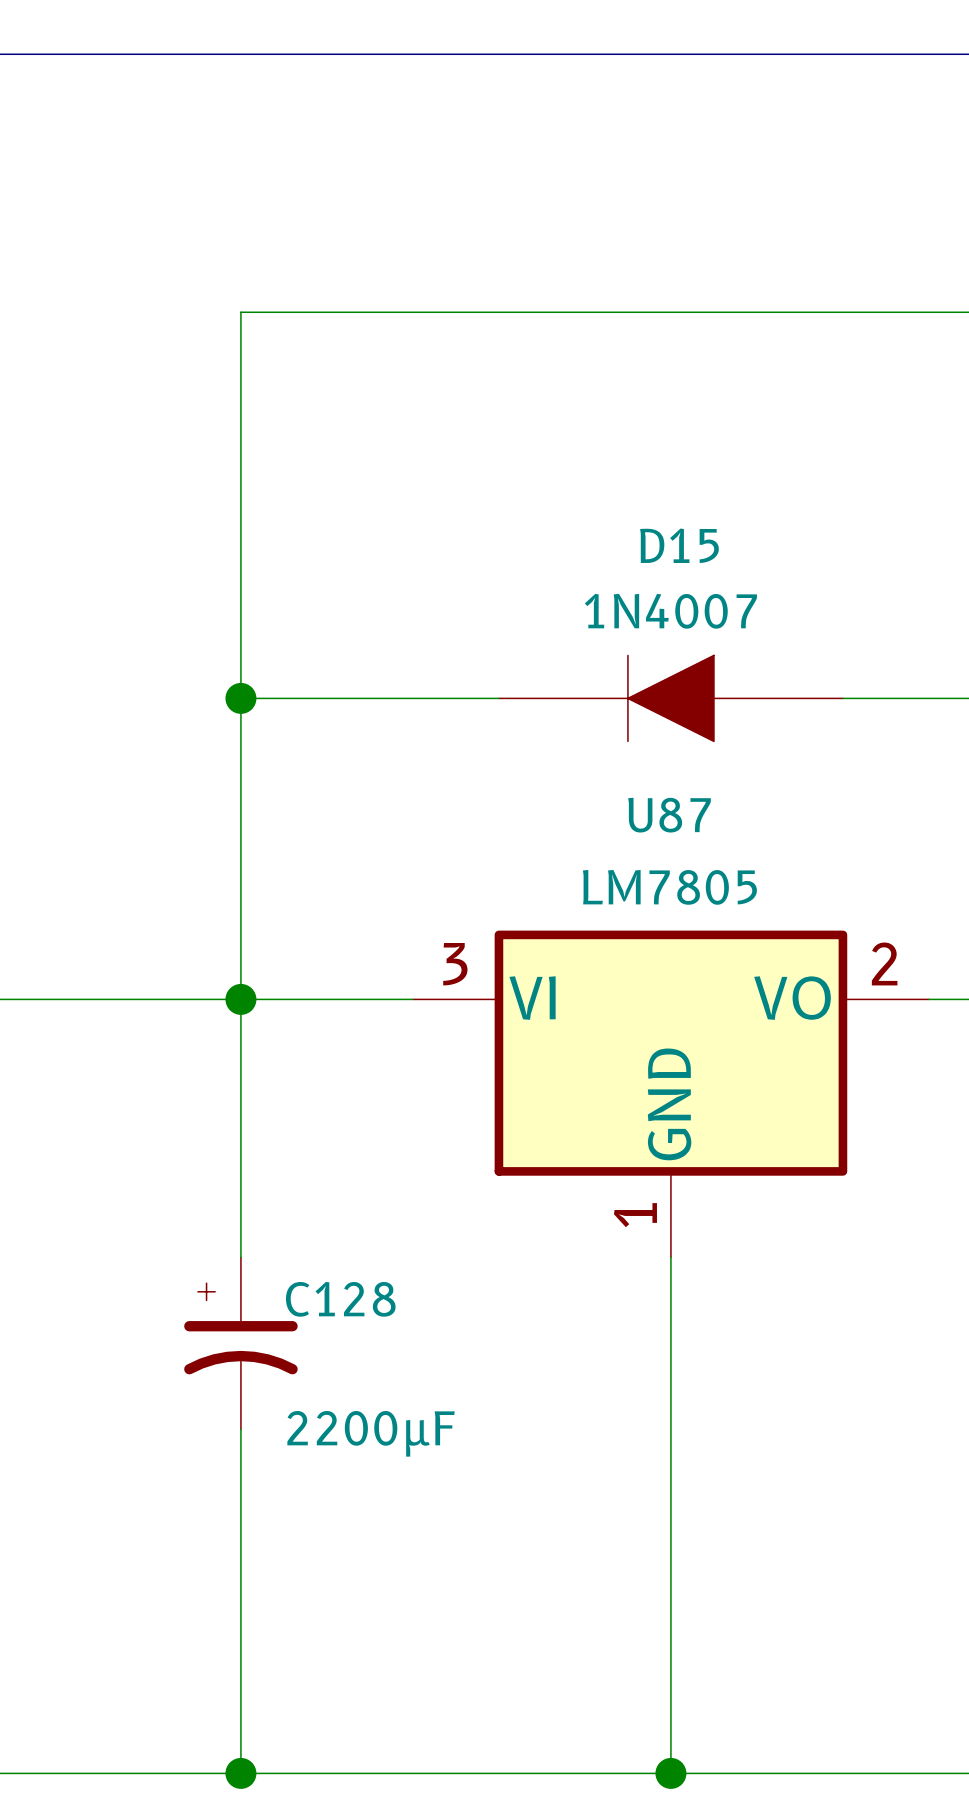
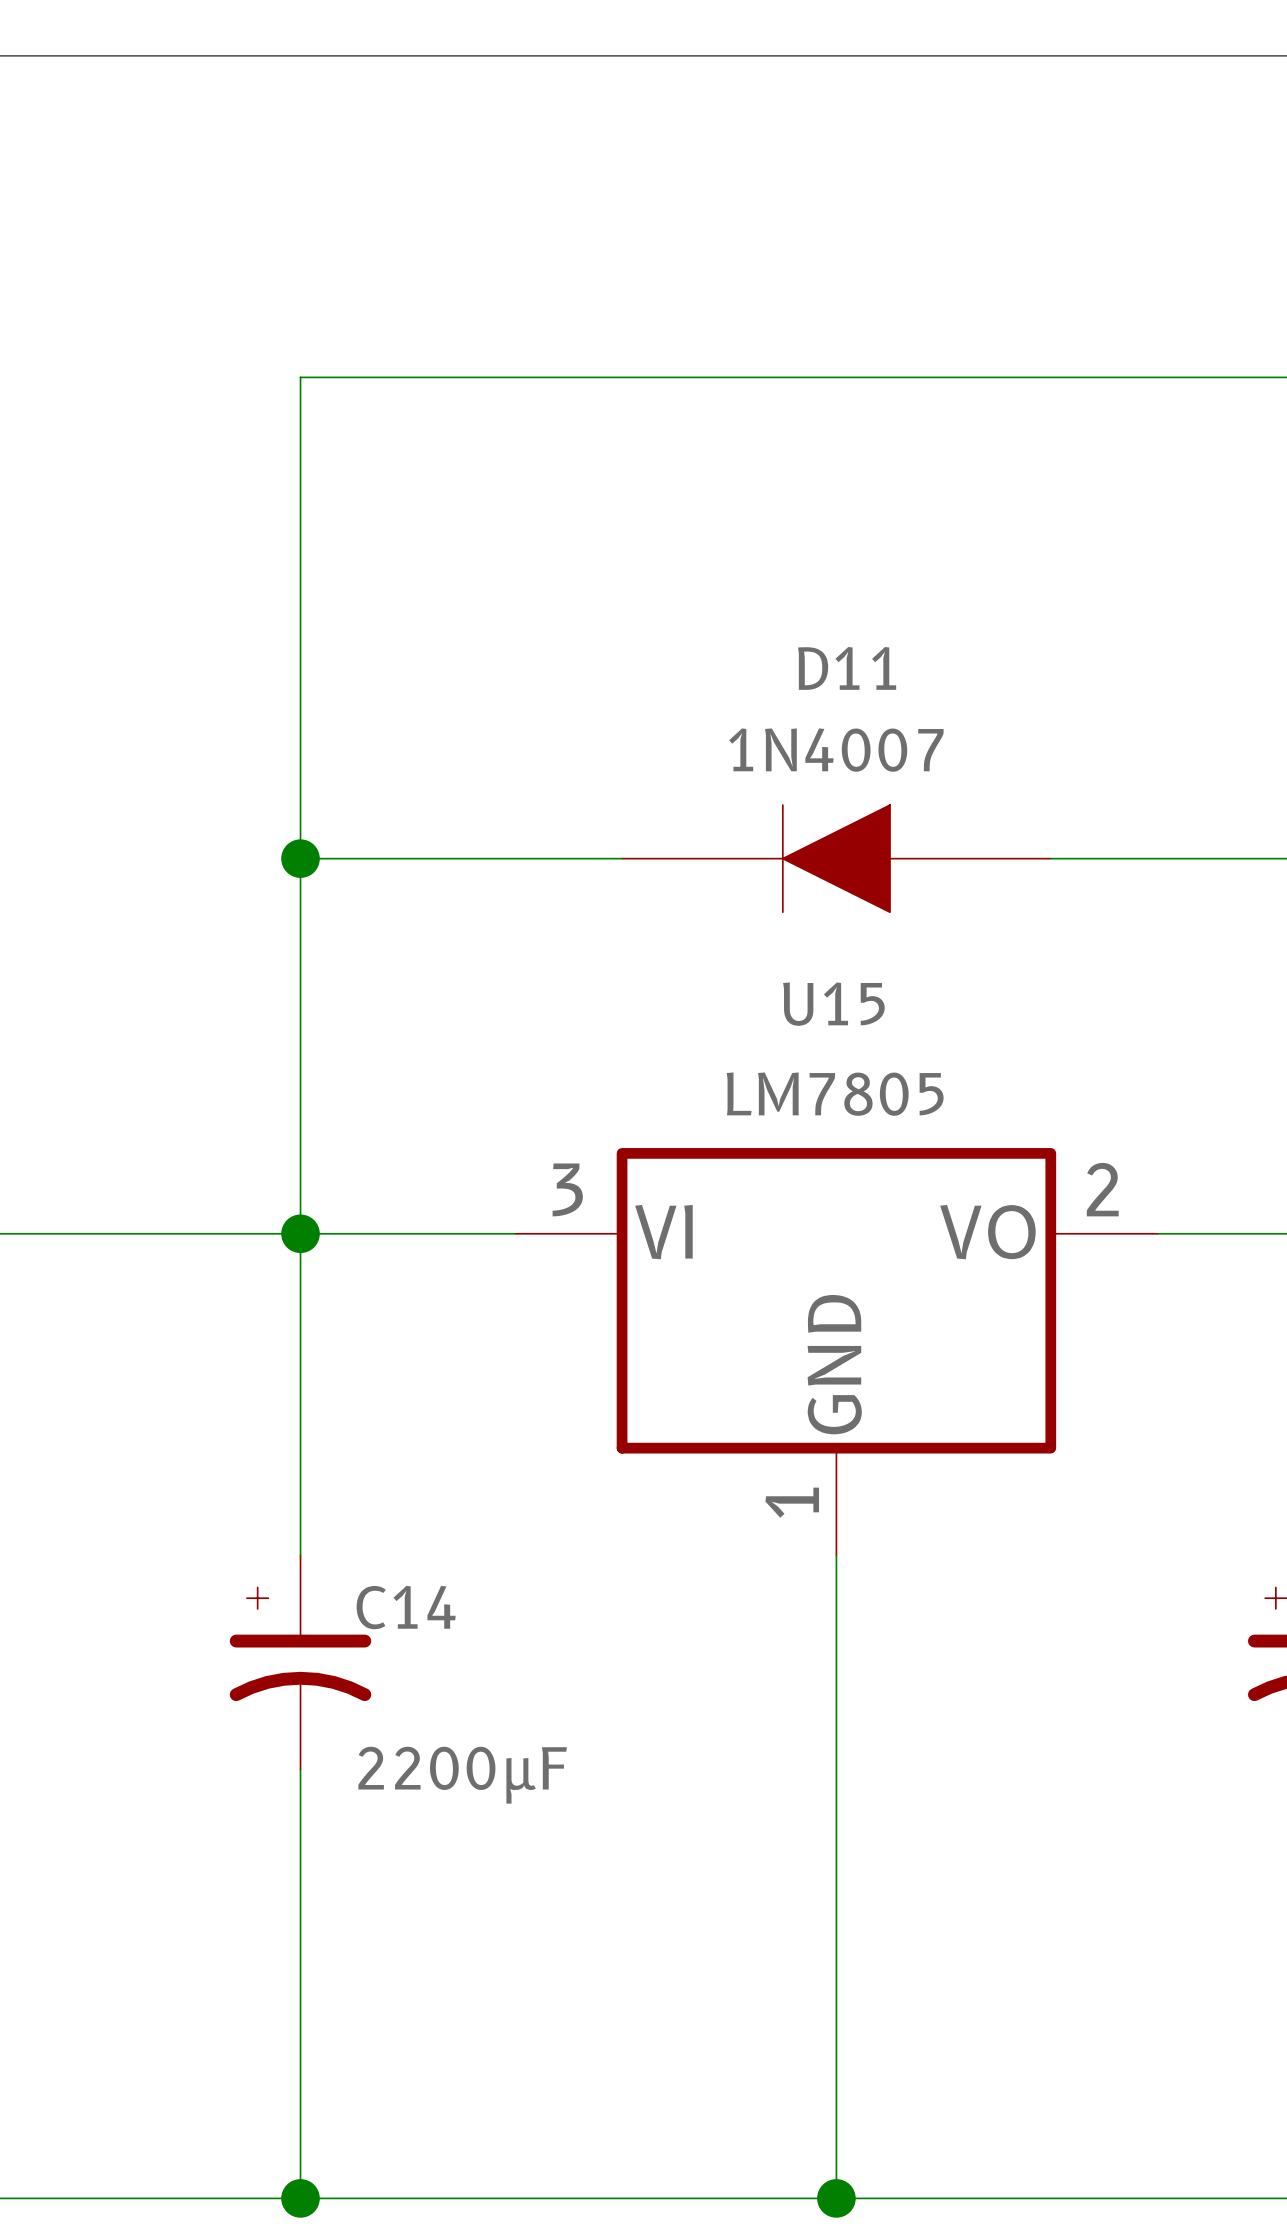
D15 name: D15 (679, 545) -> D11 (847, 668)
U87 name: U87 (669, 815) -> U15 (833, 1004)
C128 name: C128 (340, 1299) -> C14 (406, 1607)

